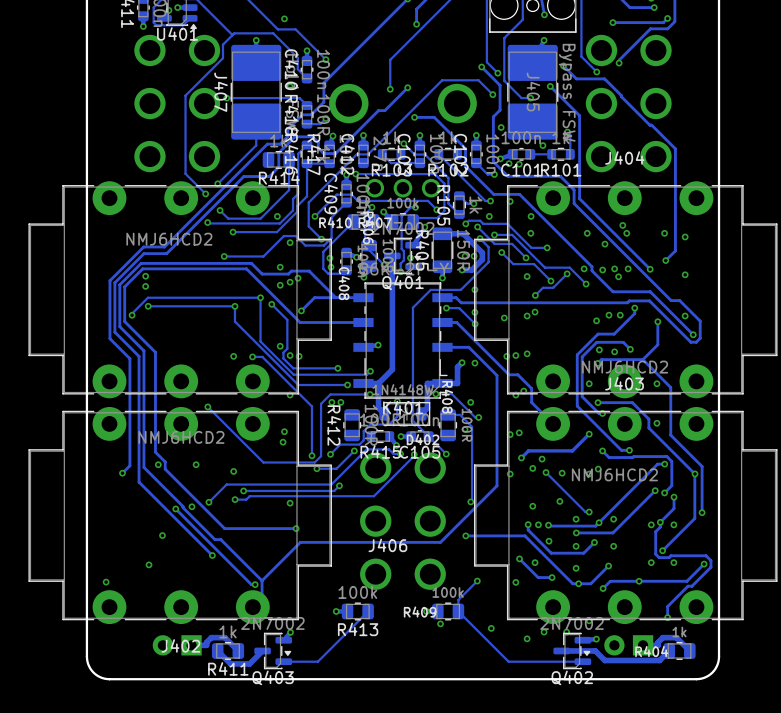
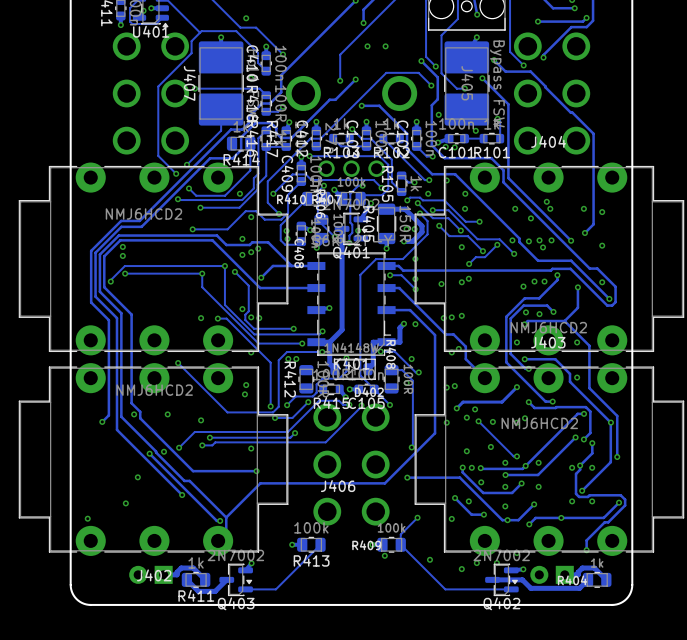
via: none -> (367, 46)
via: none -> (385, 46)

